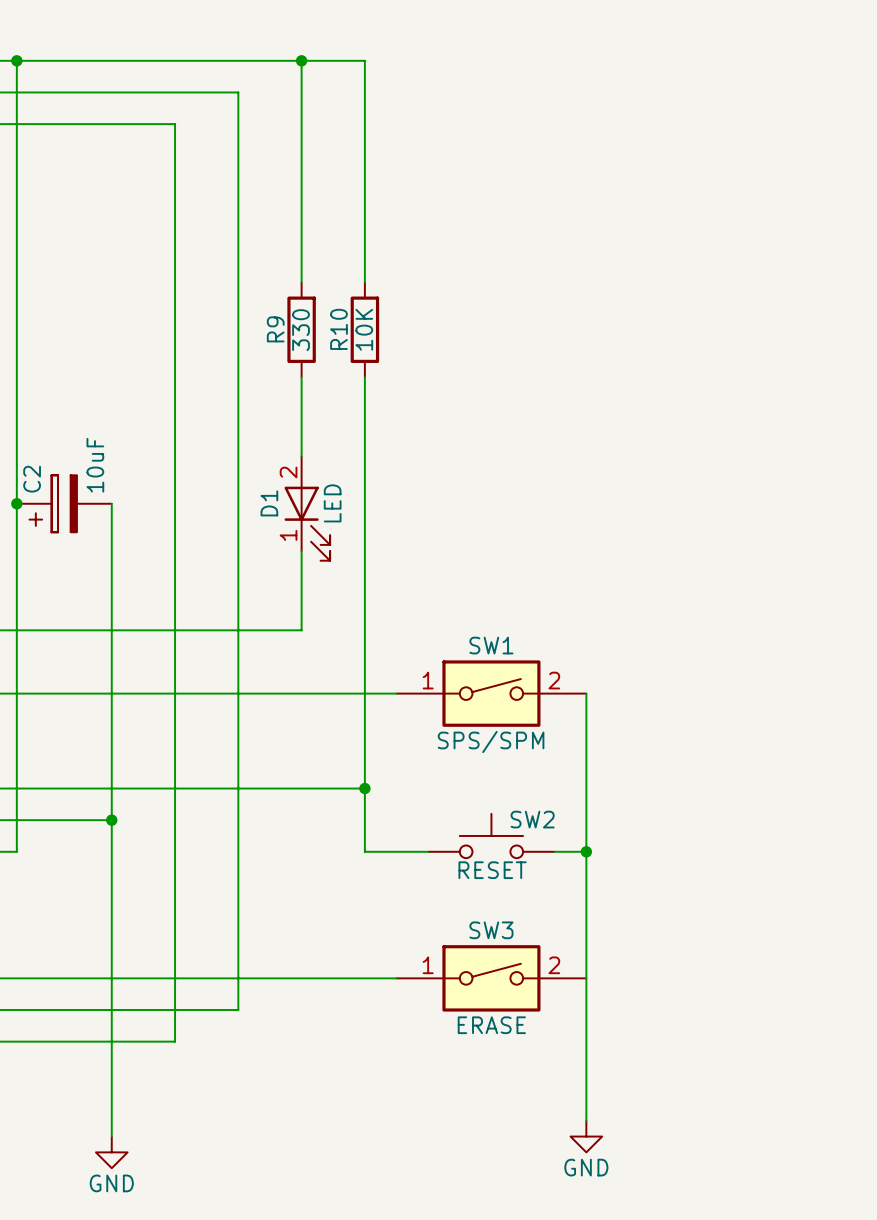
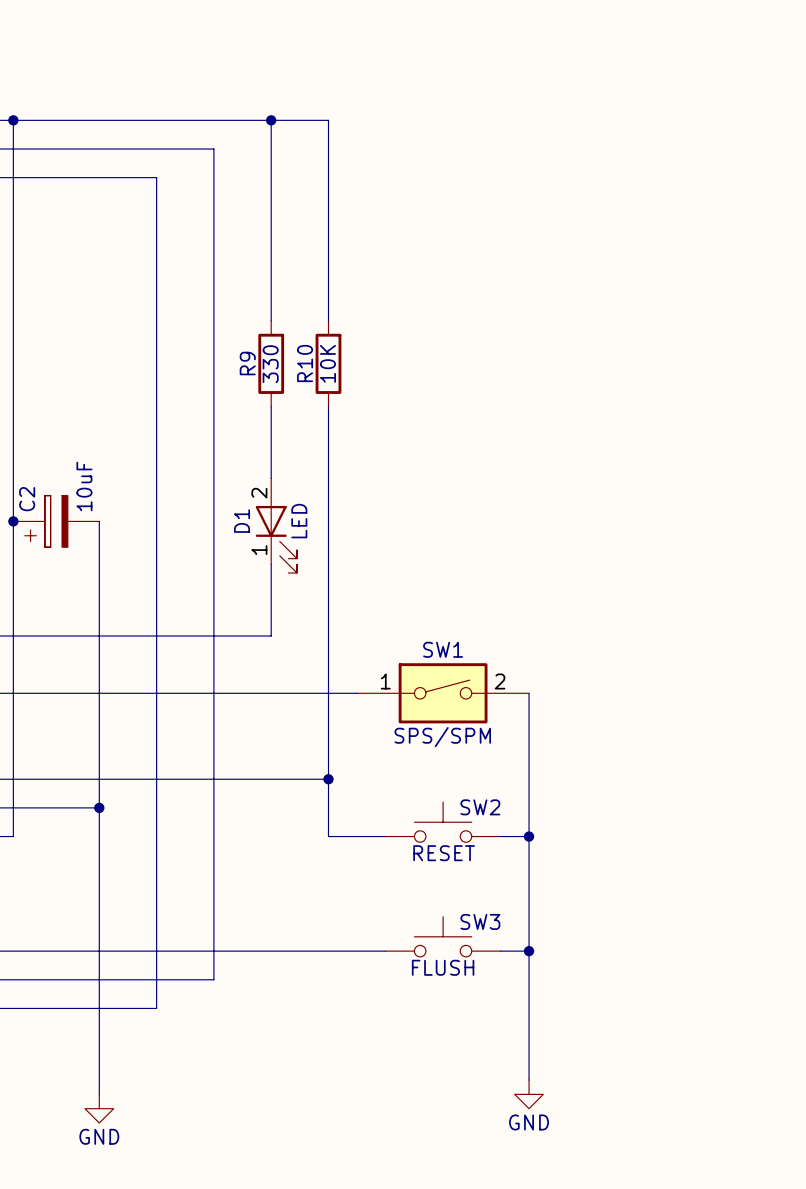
SW3 name position: SW3 (491, 930) -> SW3 (480, 921)
SW3 symbol: [396, 945, 587, 1012] -> [385, 916, 501, 957]
junction: none -> (529, 951)
SW3 value: ERASE (491, 1025) -> FLUSH (443, 967)

